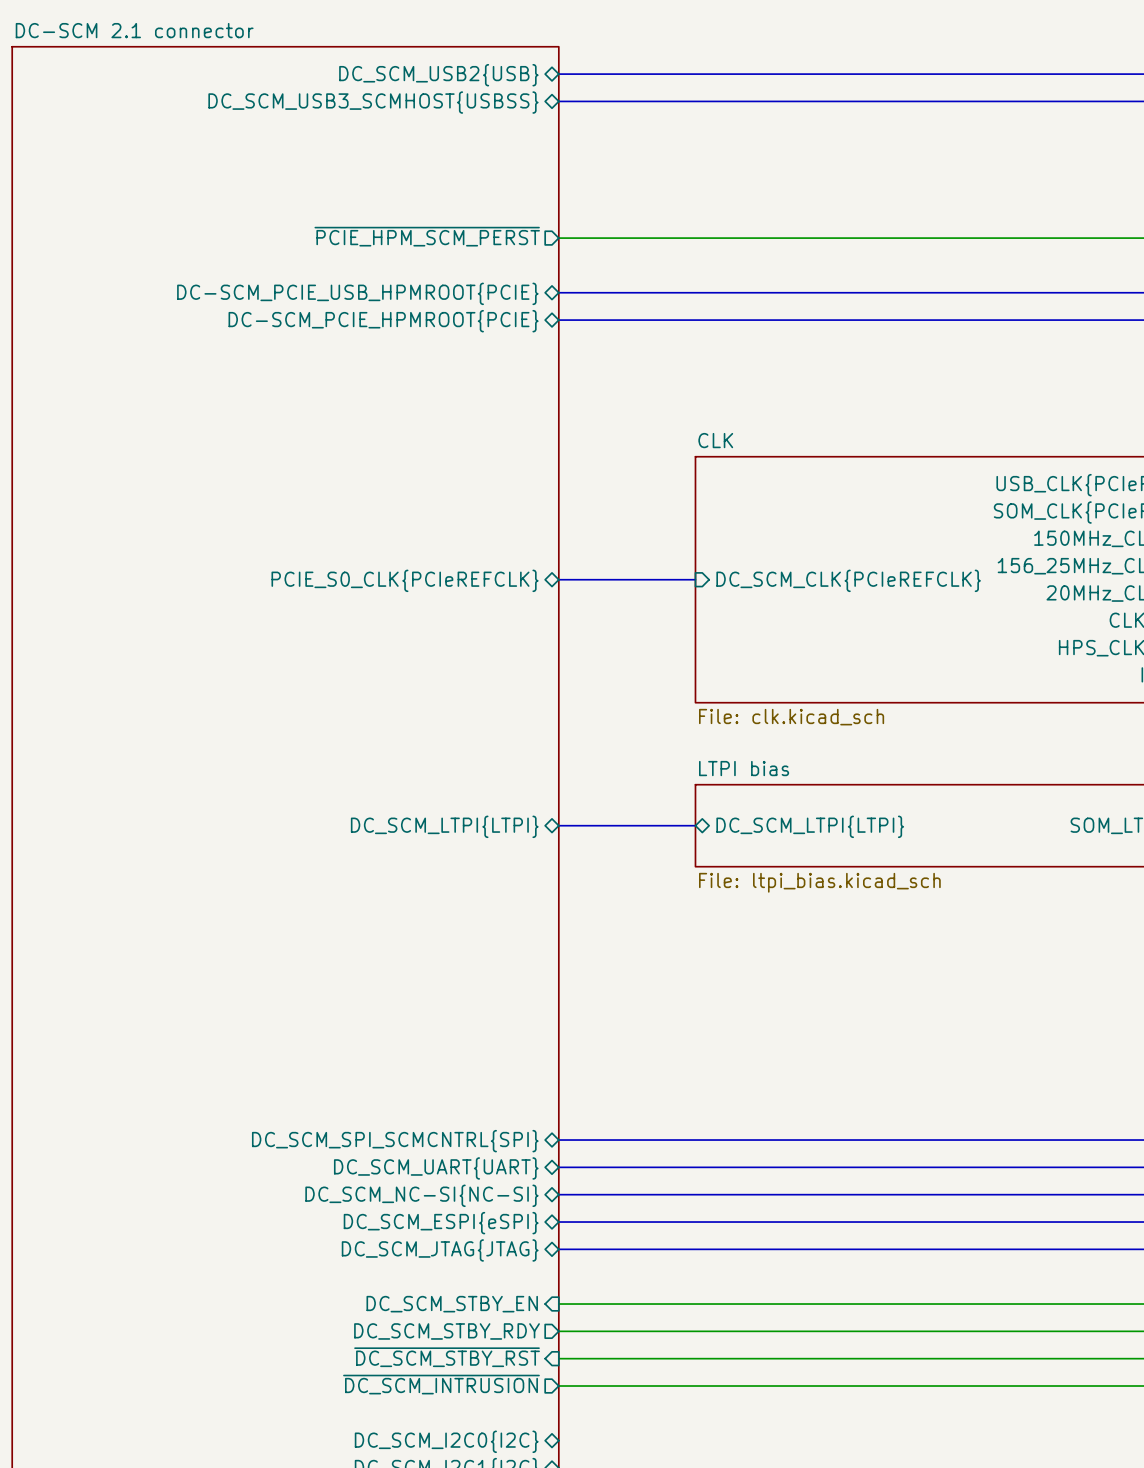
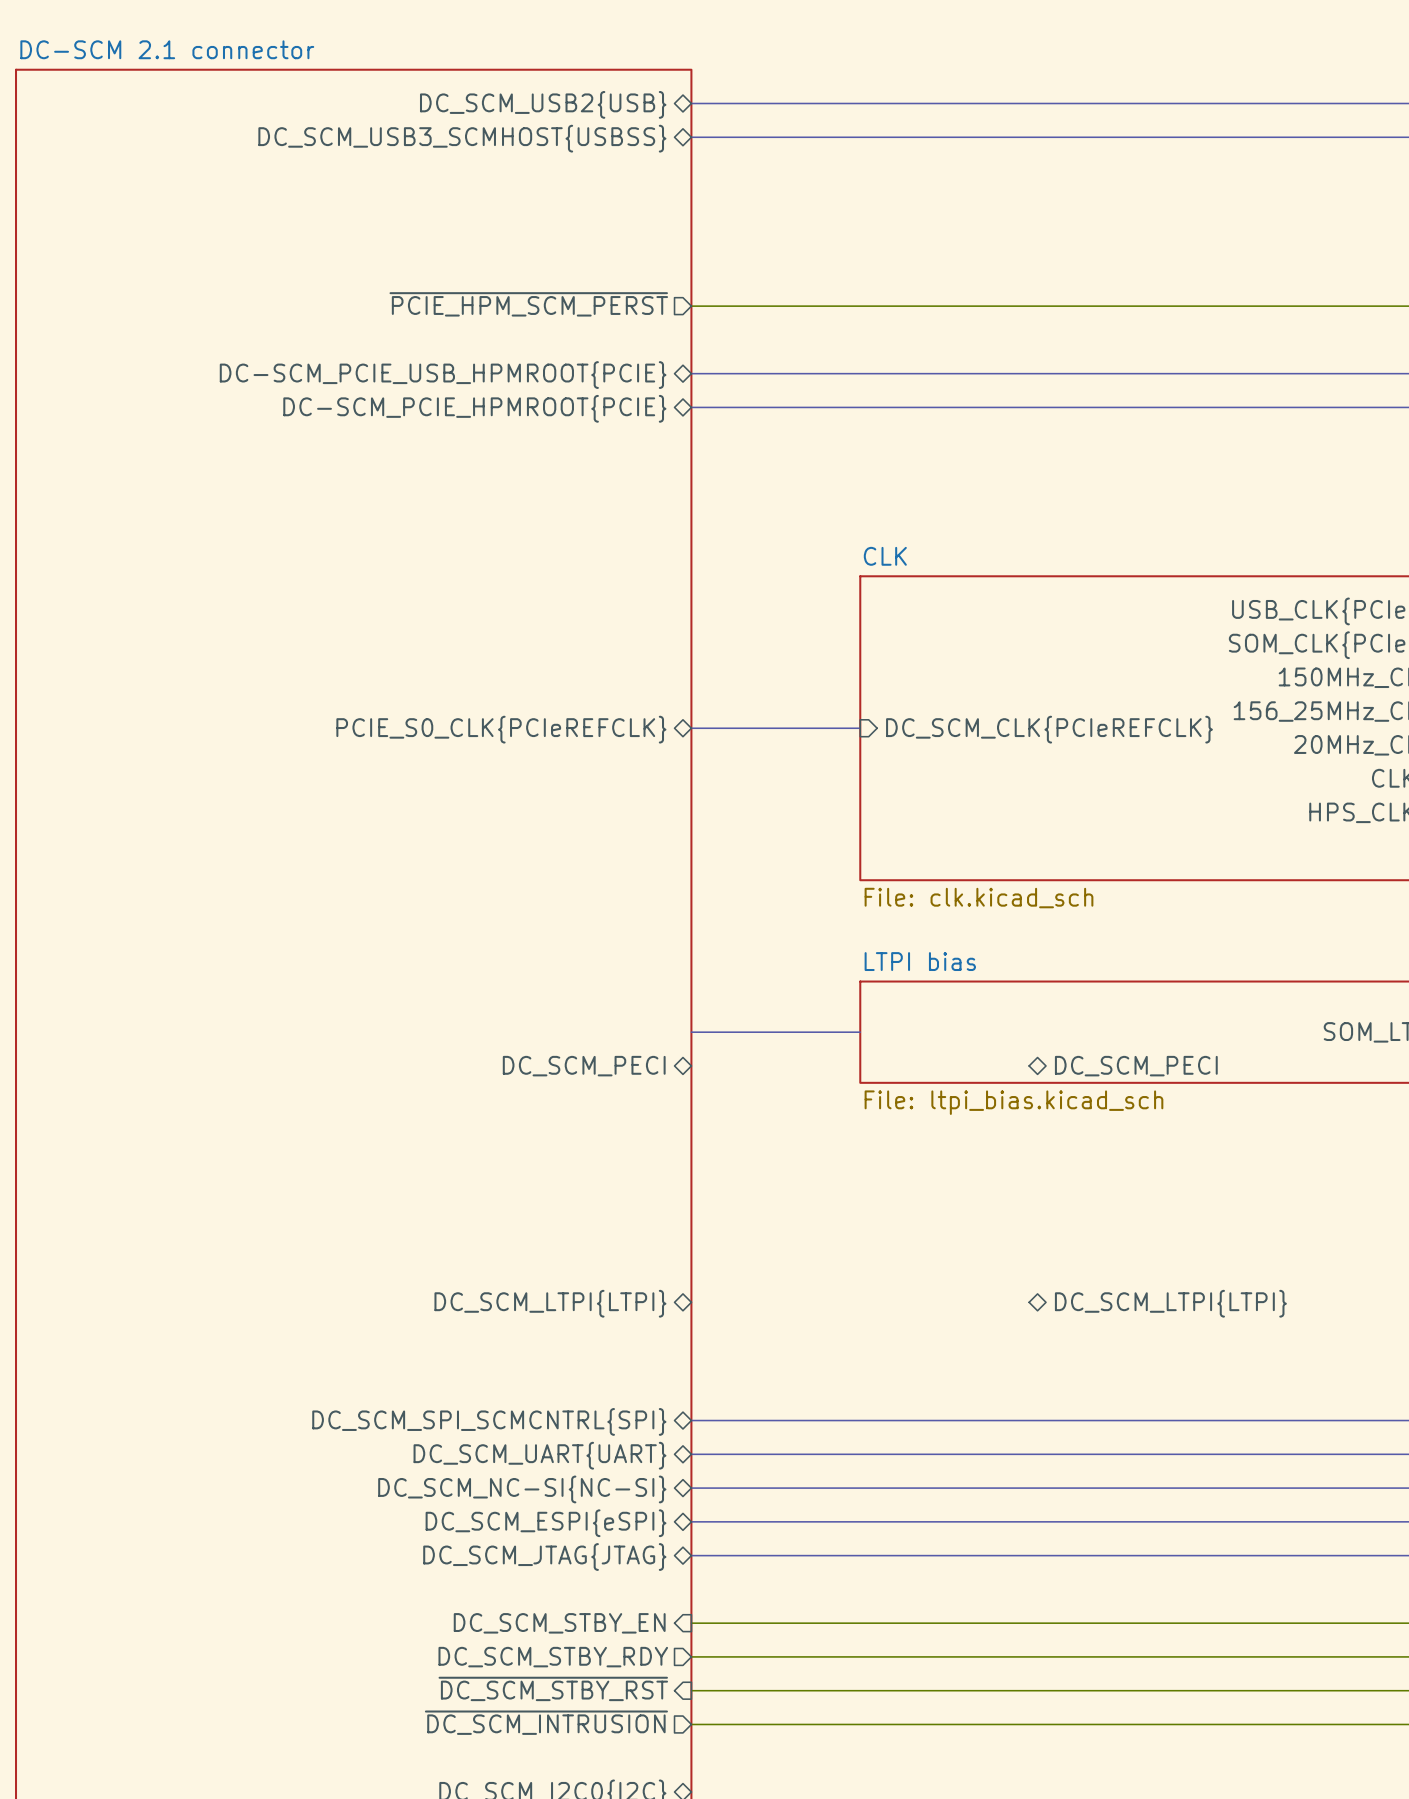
sheet pin: DC_SCM_LTPI{LTPI} (444, 826) -> DC_SCM_PECI (584, 1066)
sheet pin: DC_SCM_LTPI{LTPI} (810, 826) -> DC_SCM_PECI (1136, 1066)
sheet pin: none -> DC_SCM_LTPI{LTPI} (550, 1303)
sheet pin: none -> DC_SCM_LTPI{LTPI} (1170, 1303)

